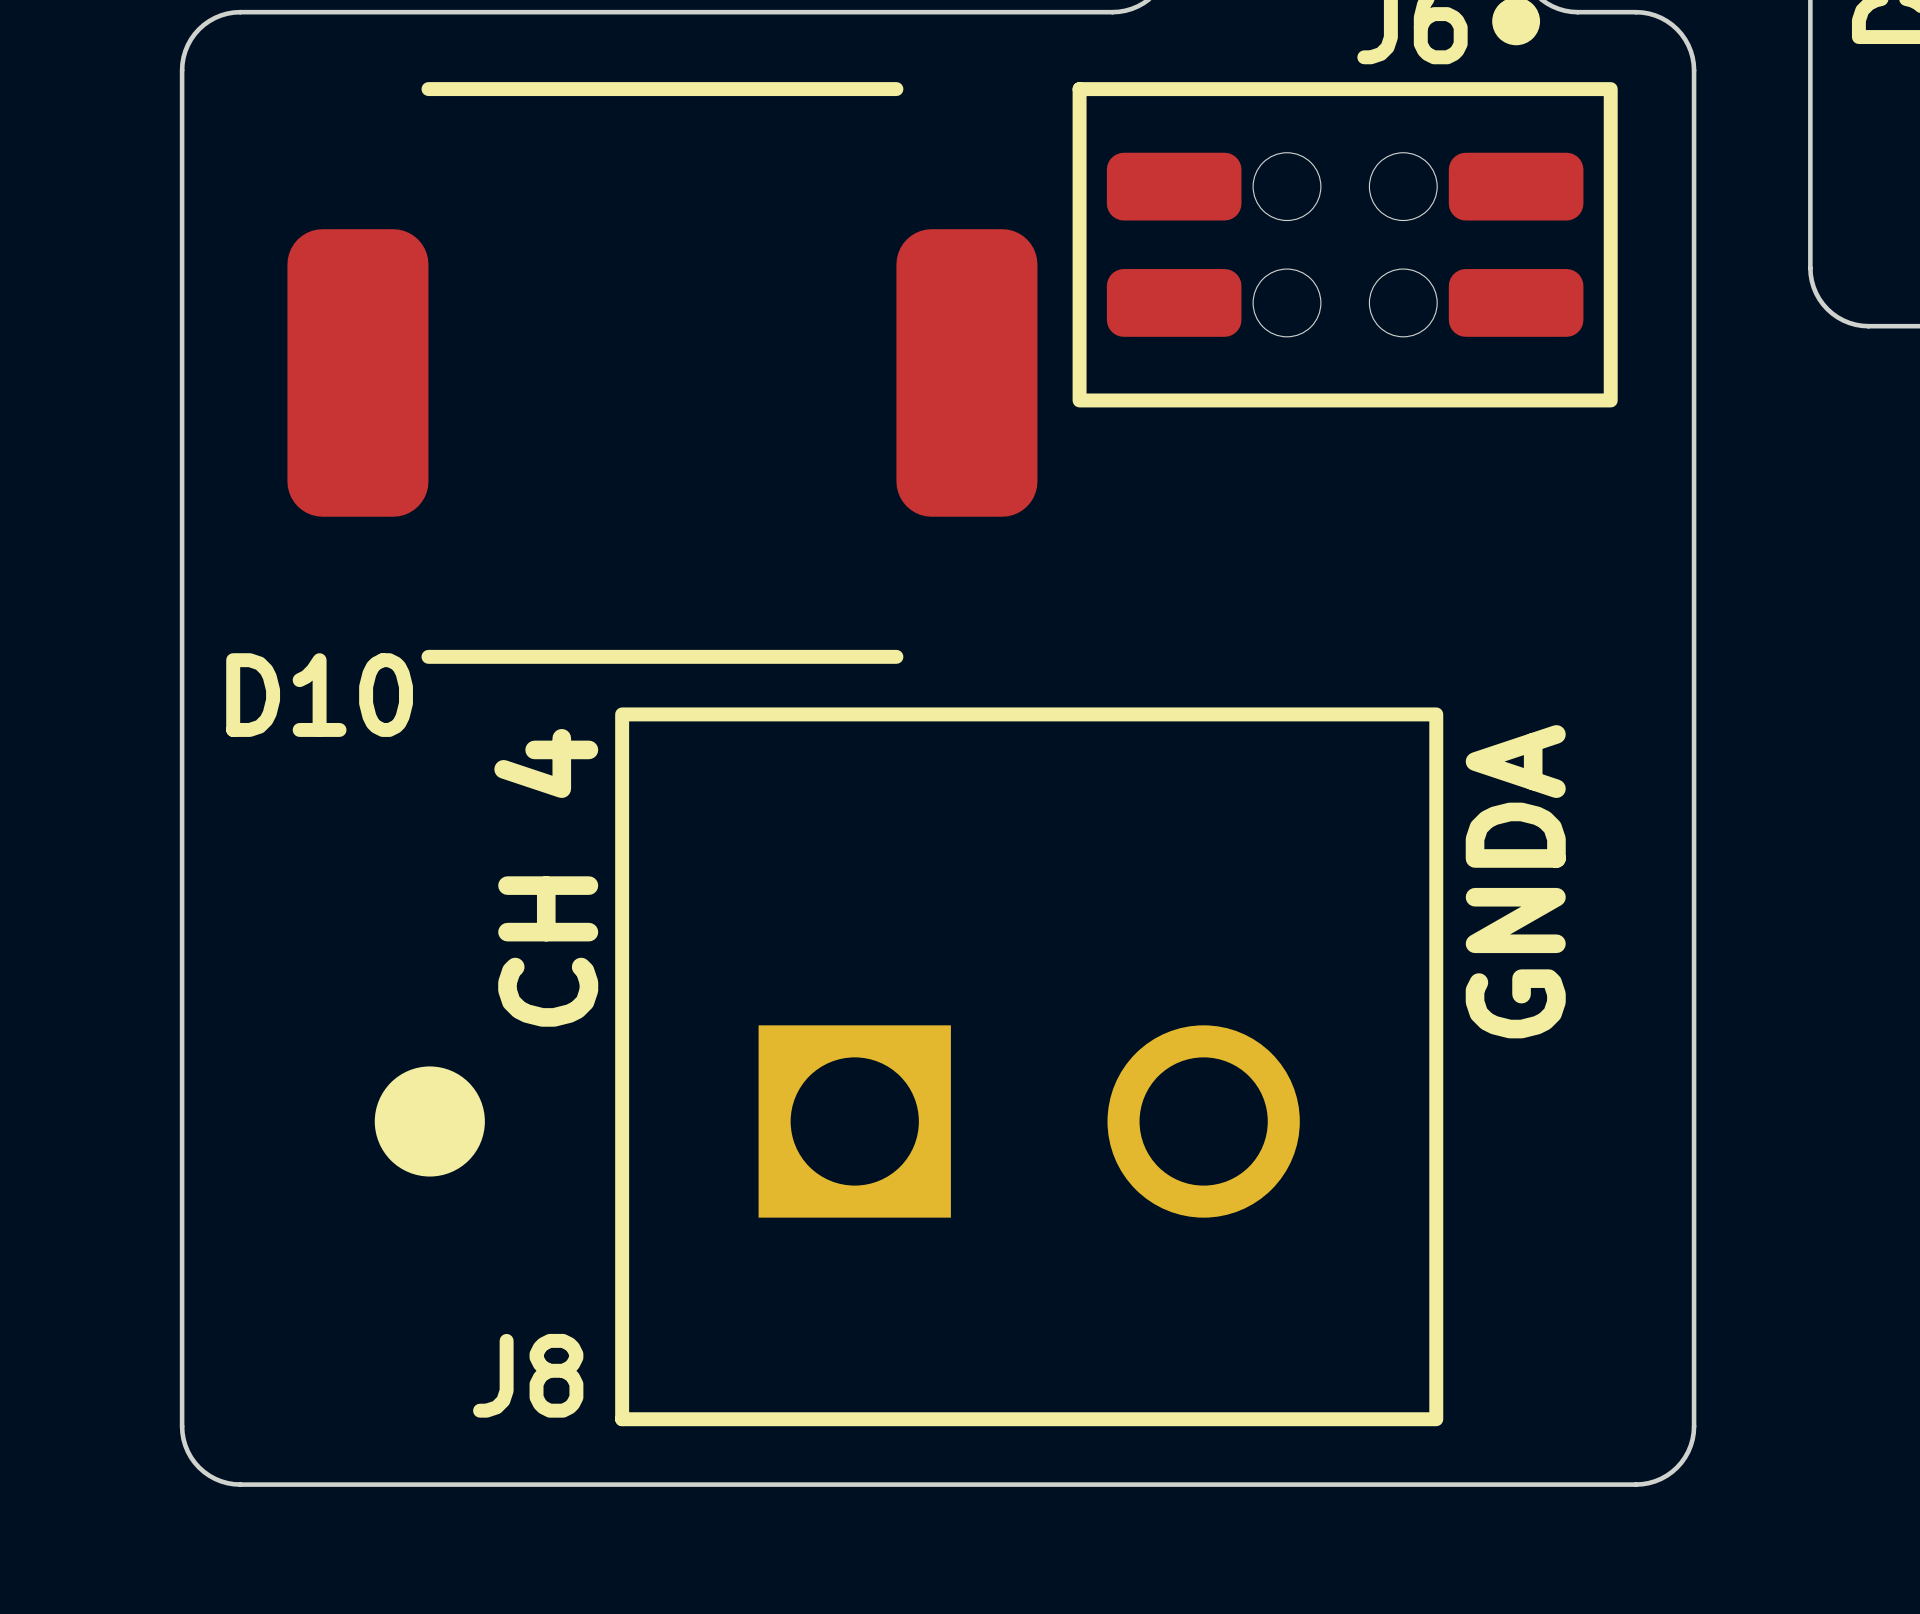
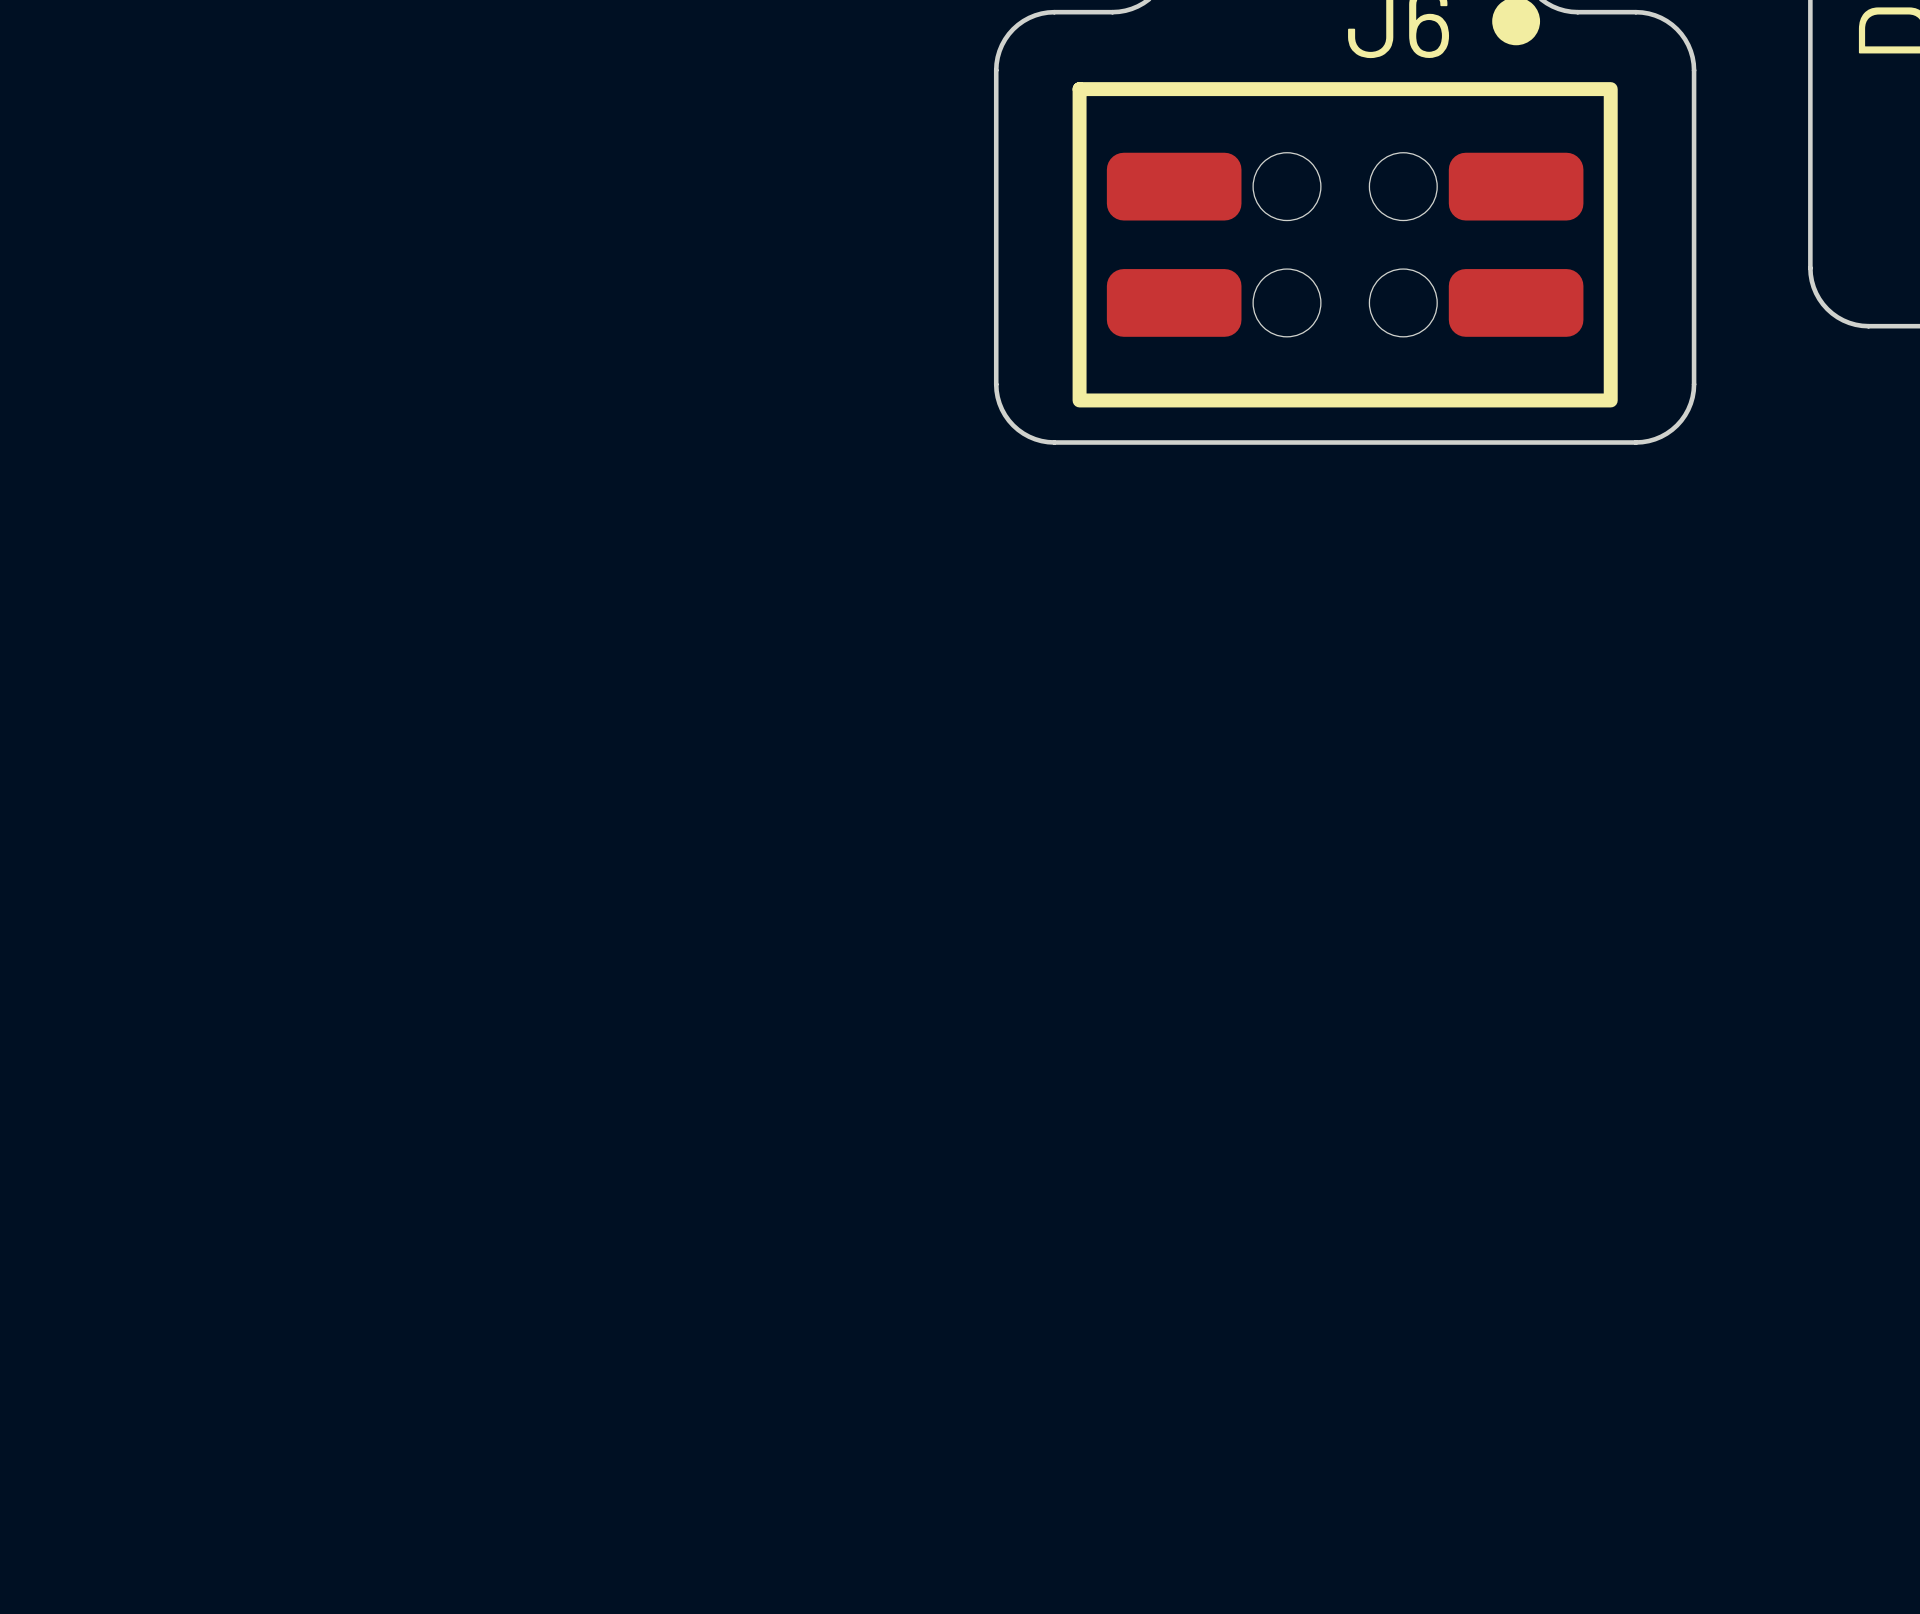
board edge: (1054, 12) (240, 12) (221, 15) (209, 21) (191, 39) (183, 57) (182, 70) (182, 1426) (187, 1451) (199, 1467) (209, 1475) (227, 1483) (240, 1484) (1635, 1484) (1655, 1481) (1672, 1471) (1688, 1451) (1694, 1426) (1694, 384) -> (1054, 12) (1029, 17) (1013, 29) (1001, 45) (996, 63) (996, 390) (1005, 415) (1023, 433) (1035, 439) (1054, 442) (1642, 442) (1661, 436) (1677, 425) (1690, 403) (1694, 384)
D10: (662, 372) -> none
text: CH 4 (546, 877) -> none
text: GNDA (1515, 881) -> none
J8: (909, 1066) -> none

